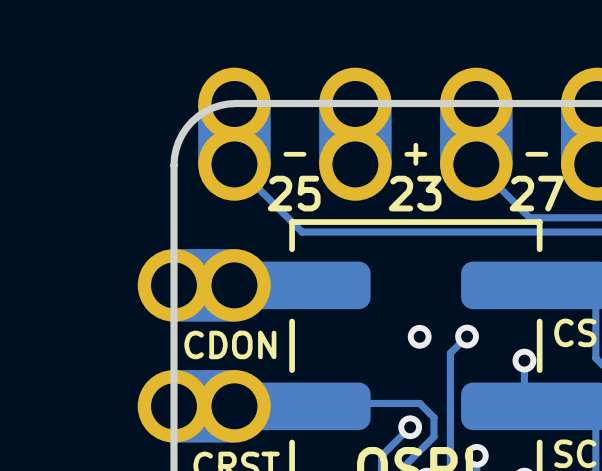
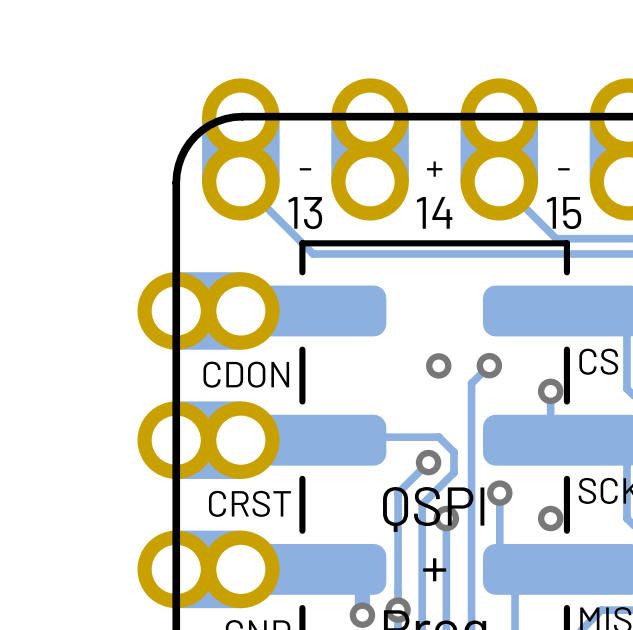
text: 25 (294, 193) -> 13 (305, 213)
text: 23 (415, 193) -> 14 (434, 212)
text: 27 (536, 193) -> 15 (564, 213)

